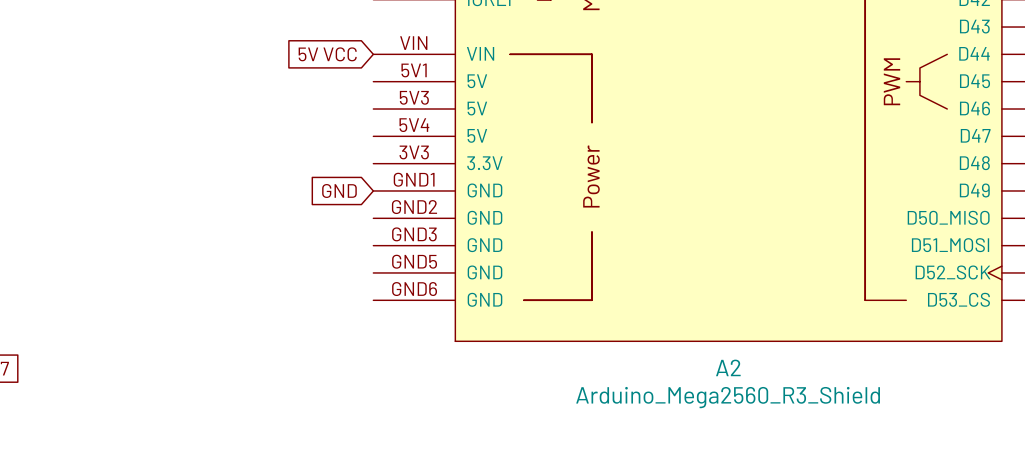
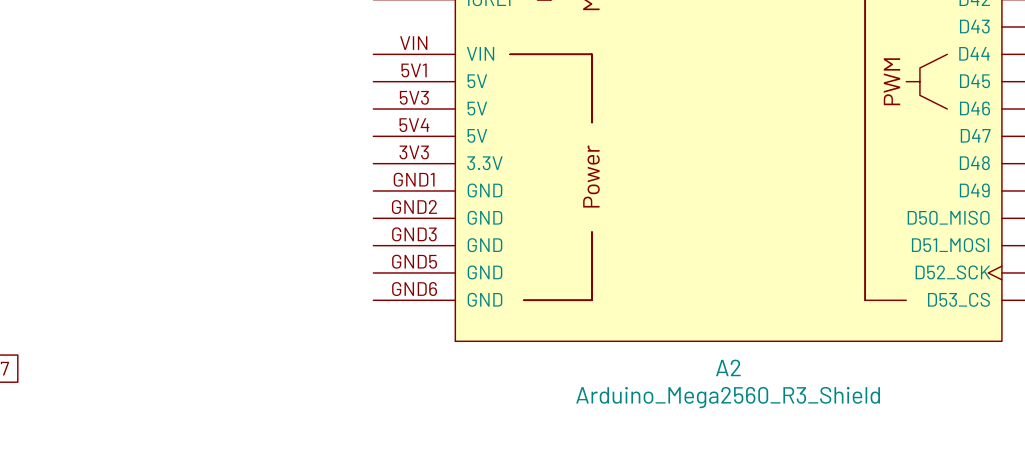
global label: 5V VCC (327, 54) -> none
global label: GND (339, 190) -> none

